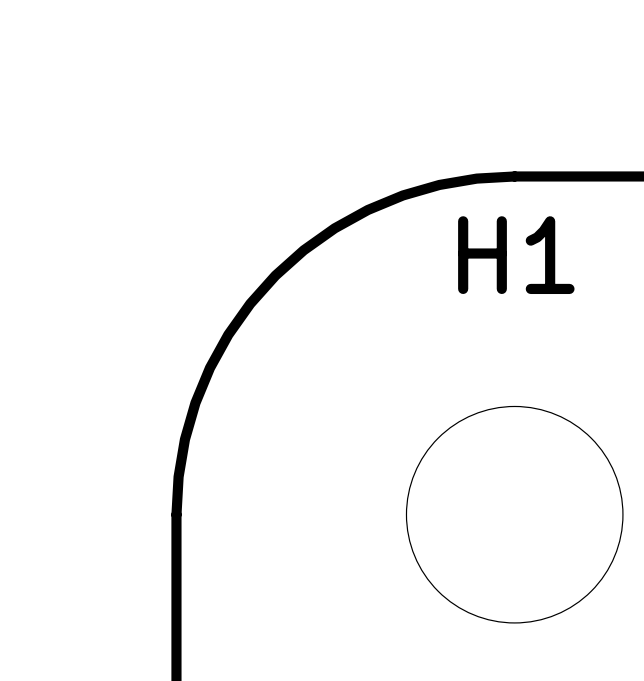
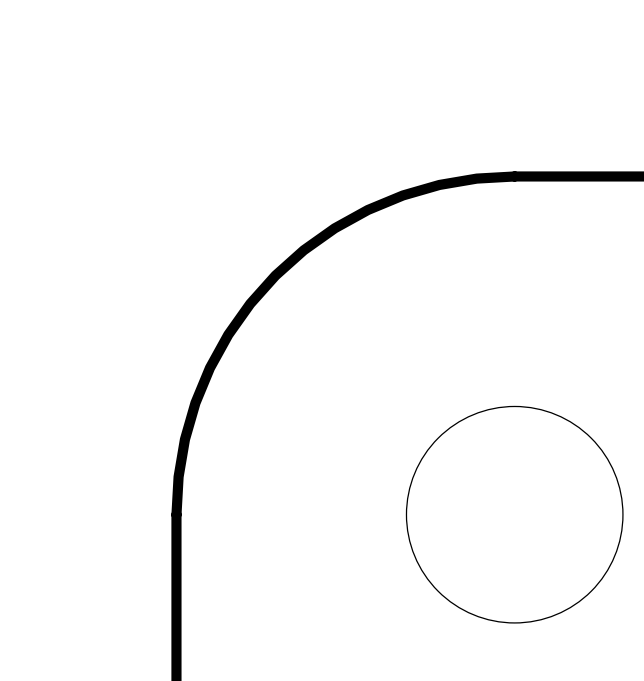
H1 name: H1 (516, 255) -> none

